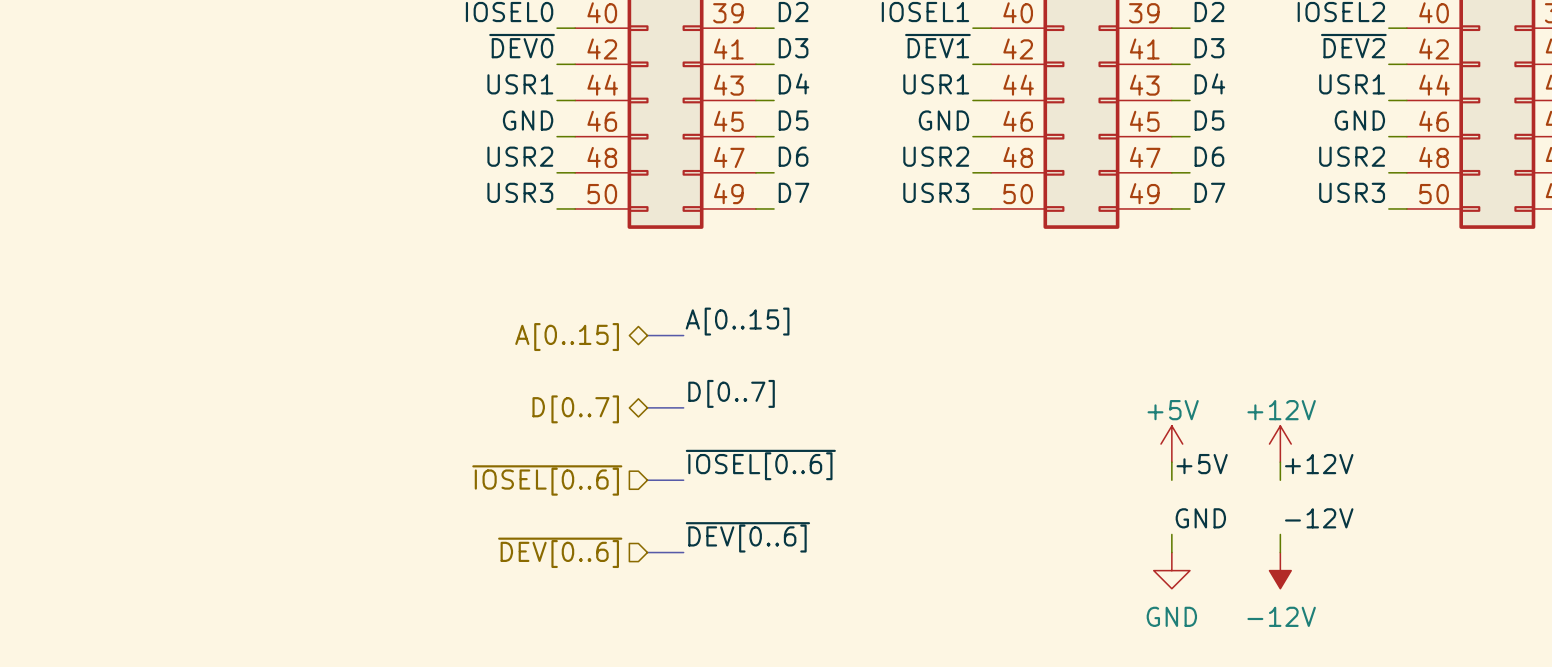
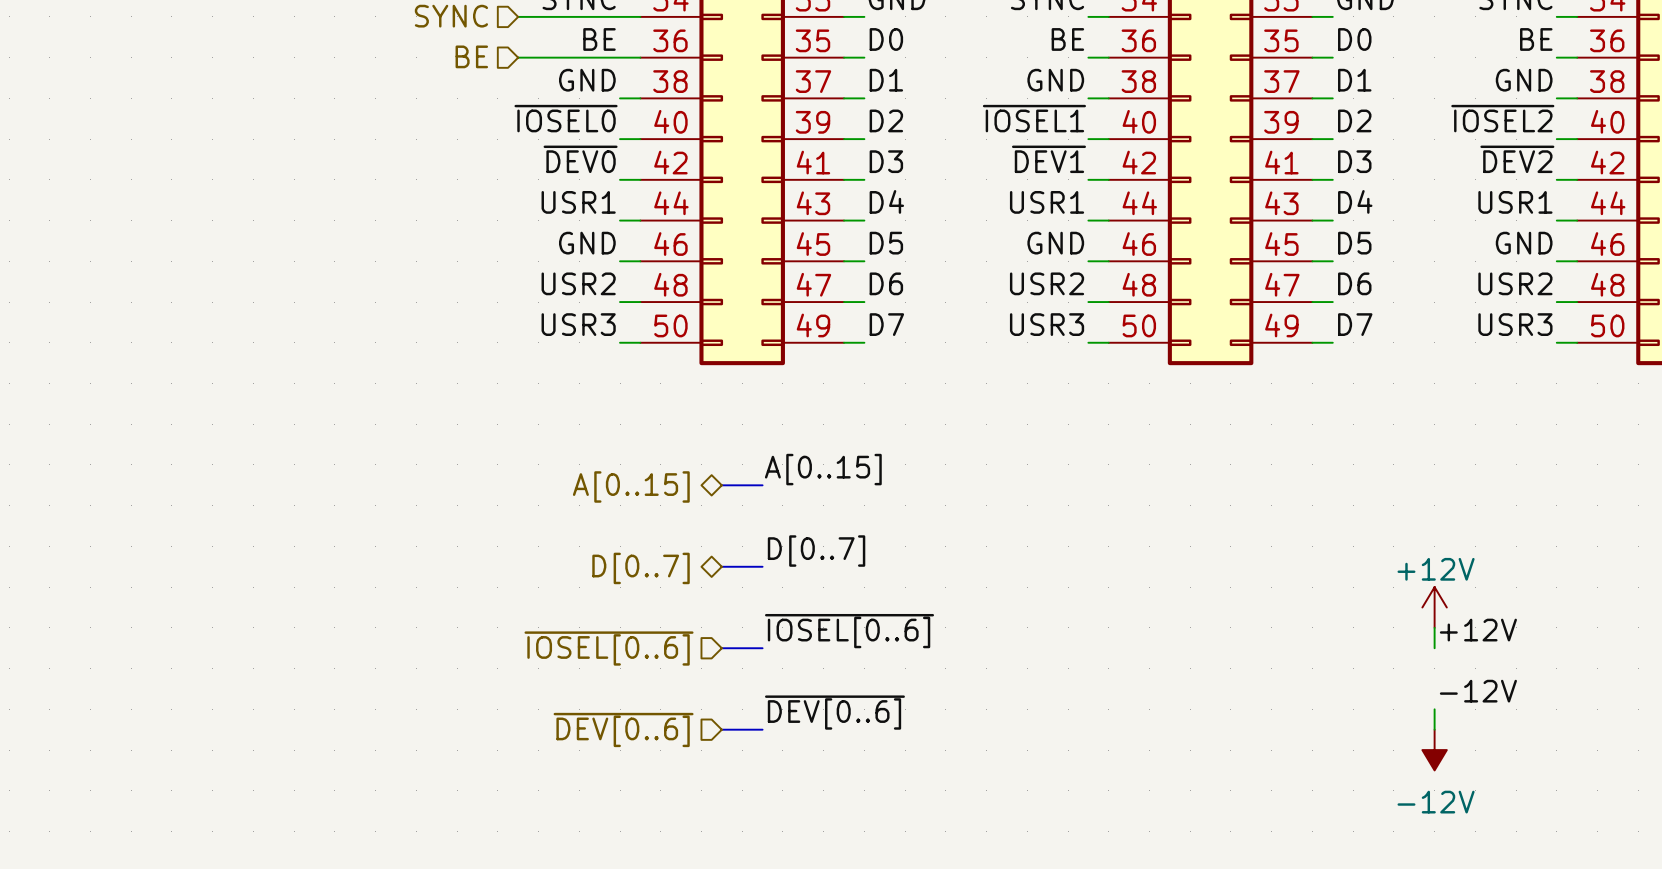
power symbol: +5V (1171, 444) -> none
wire: (1171, 462) (1171, 480) -> none
label: +5V (1202, 464) -> none
label: GND (1200, 518) -> none
wire: (1171, 534) (1171, 552) -> none
power symbol: GND (1171, 570) -> none

